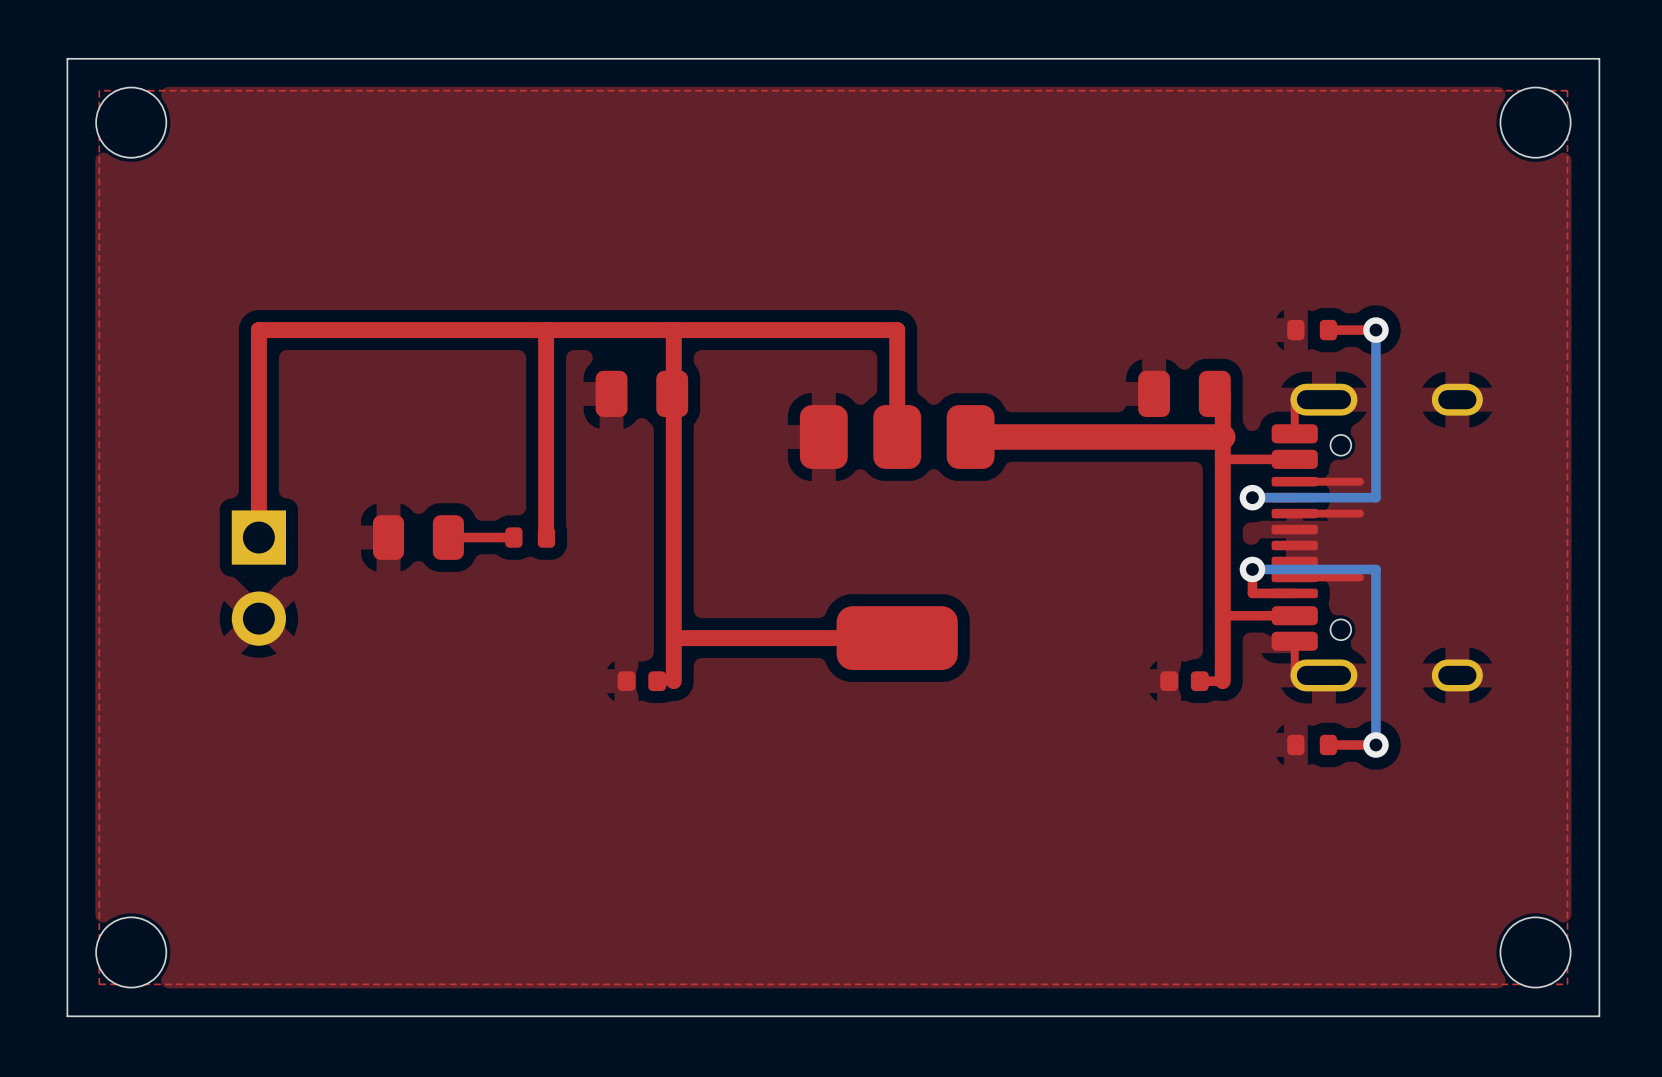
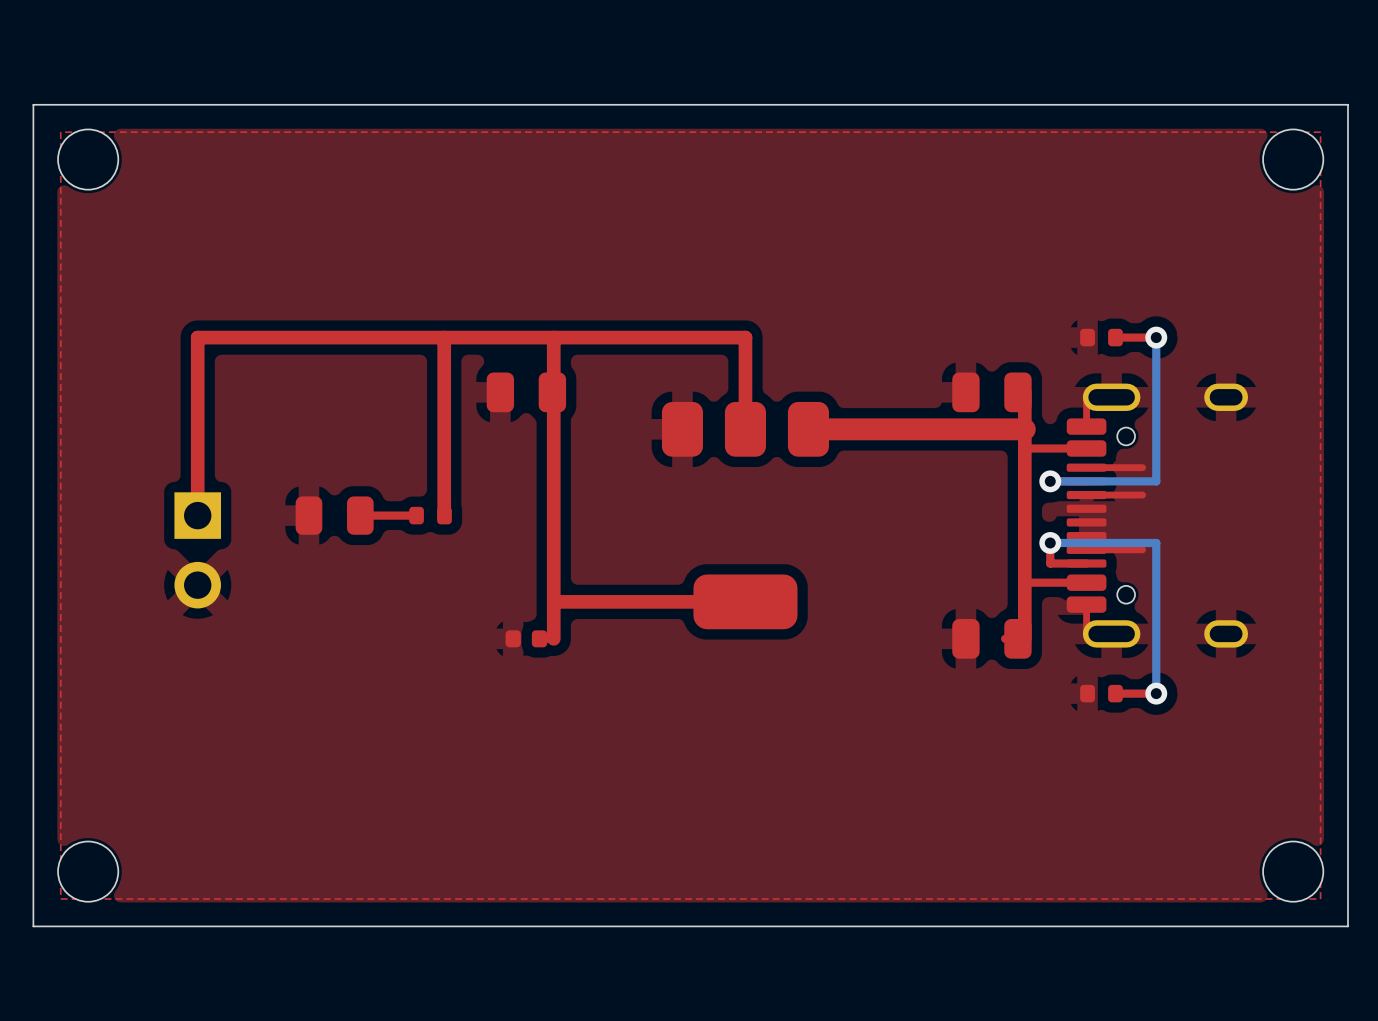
part footprint: [1160, 671, 1209, 692] -> [952, 618, 1032, 659]

